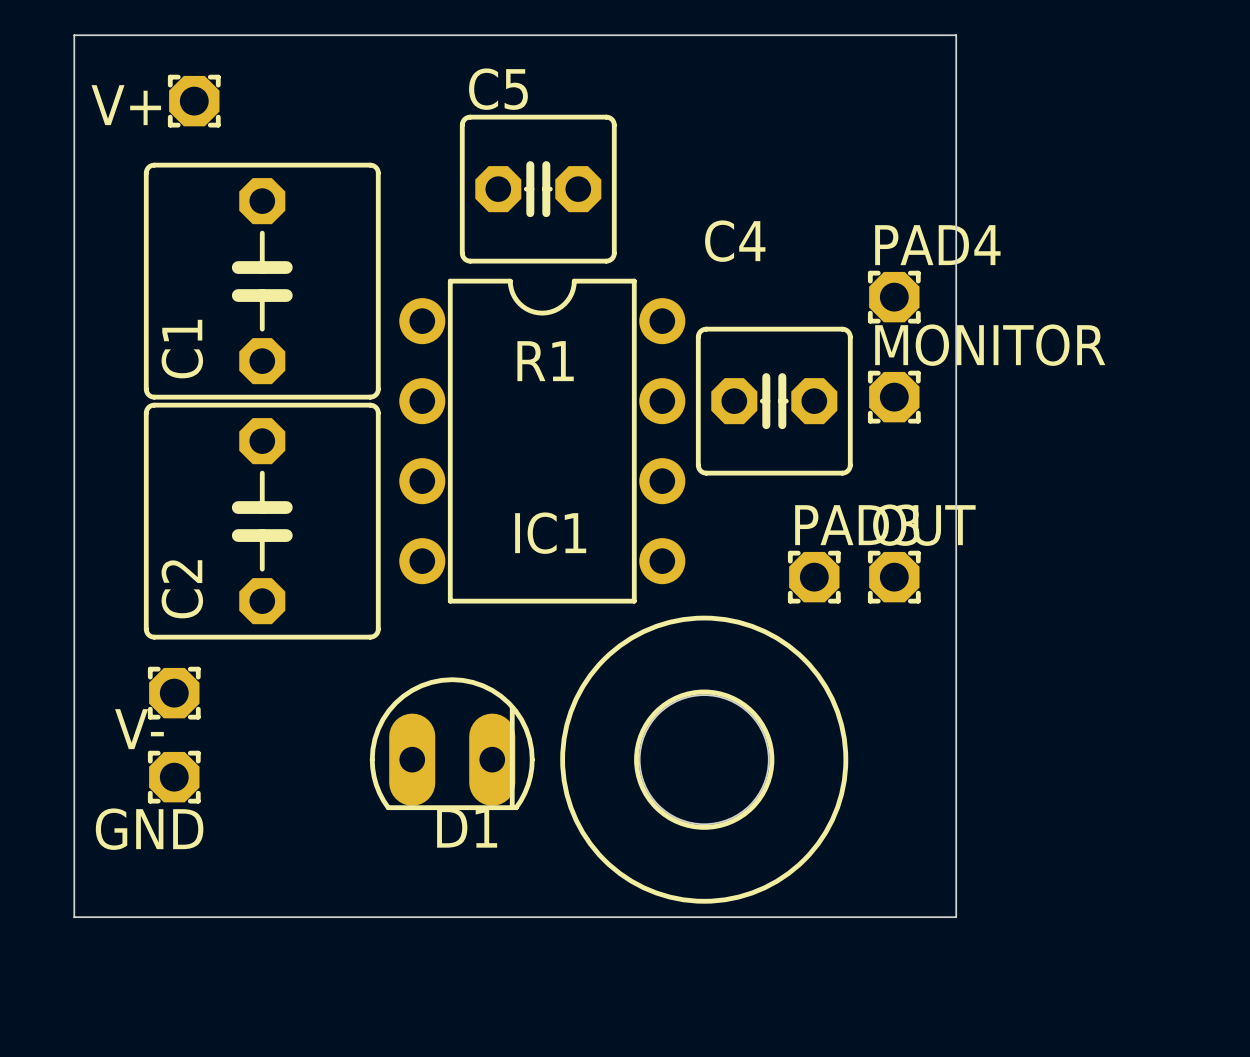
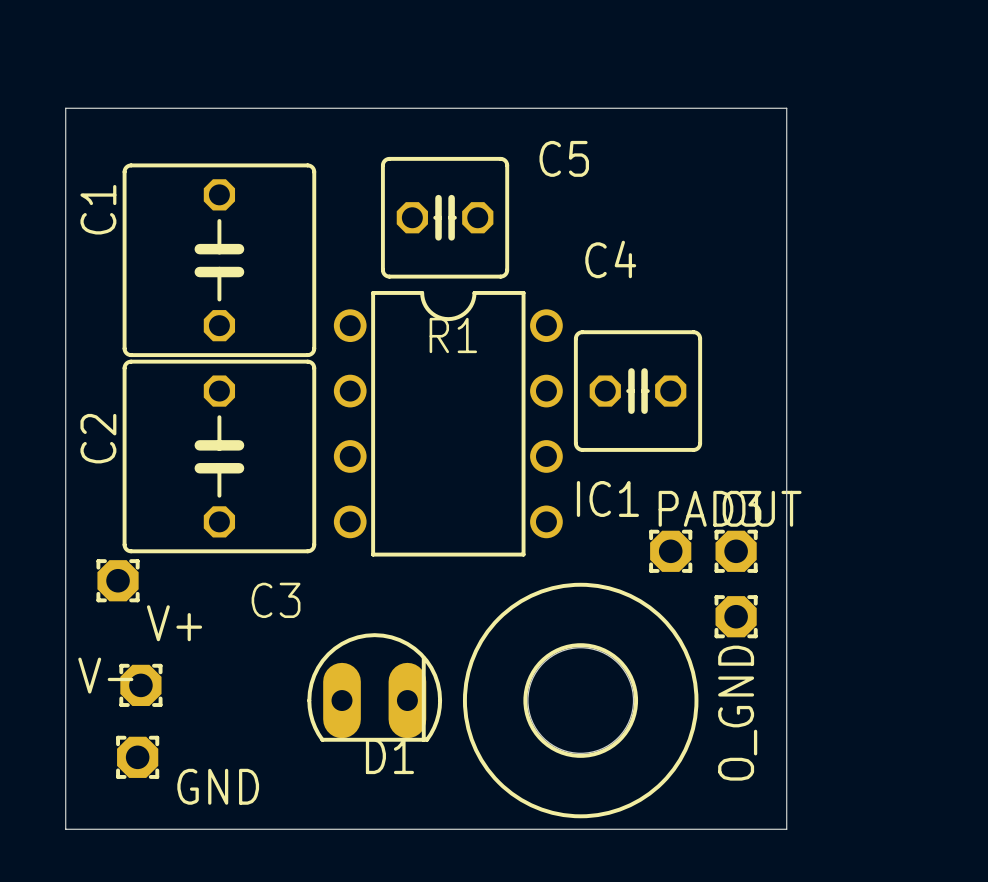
C5 name position: C5 (498, 89) -> C5 (564, 158)
V+ position: (194, 101) -> (118, 580)
V+ name position: V+ (126, 105) -> V+ (174, 623)
C5 footprint: [459, 114, 617, 264] -> [380, 156, 510, 279]
C1 footprint: [143, 162, 381, 400] -> [122, 163, 317, 358]
C4 name position: C4 (735, 241) -> C4 (610, 259)
IC1 footprint: [399, 278, 686, 604] -> [333, 290, 563, 557]
PAD4: (894, 297) -> none
C4 footprint: [695, 326, 853, 476] -> [573, 330, 703, 452]
C1 name position: C1 (182, 349) -> C1 (98, 209)
R1 position: (545, 361) -> (453, 335)
MONITOR: (894, 397) -> none
C2 footprint: [143, 402, 381, 640] -> [122, 359, 317, 554]
IC1 name position: IC1 (550, 533) -> IC1 (607, 498)
C2 name position: C2 (182, 589) -> C2 (98, 438)
C3: none -> (276, 600)
O_GND: none -> (736, 616)
V- position: (174, 693) -> (140, 685)
GND position: (174, 777) -> (137, 757)
GND name position: GND (149, 829) -> GND (218, 786)

